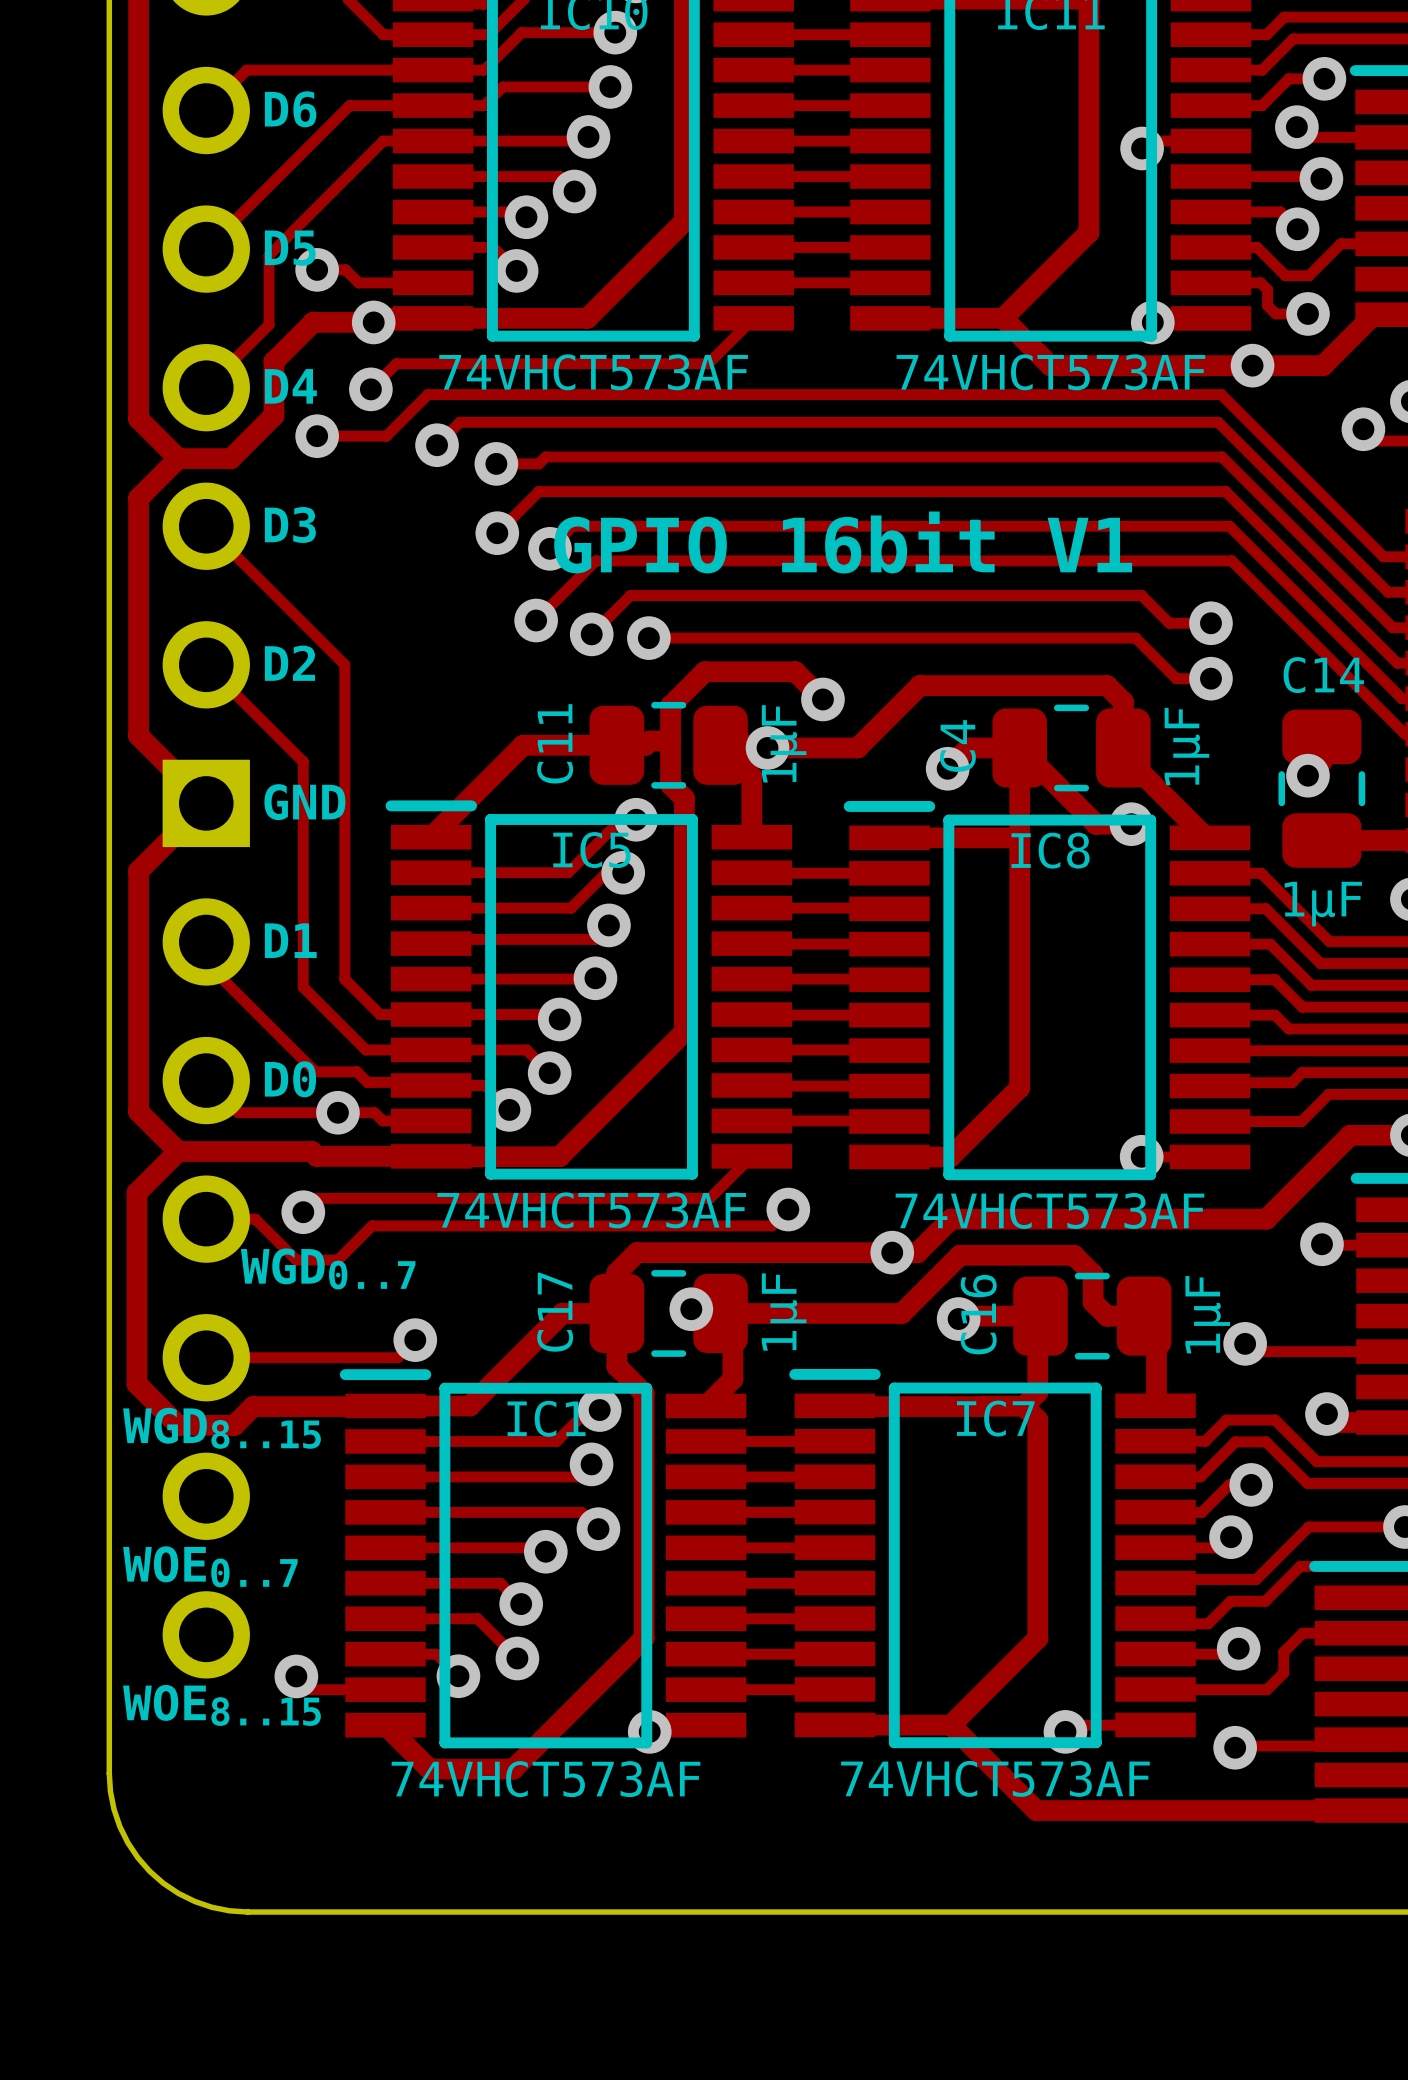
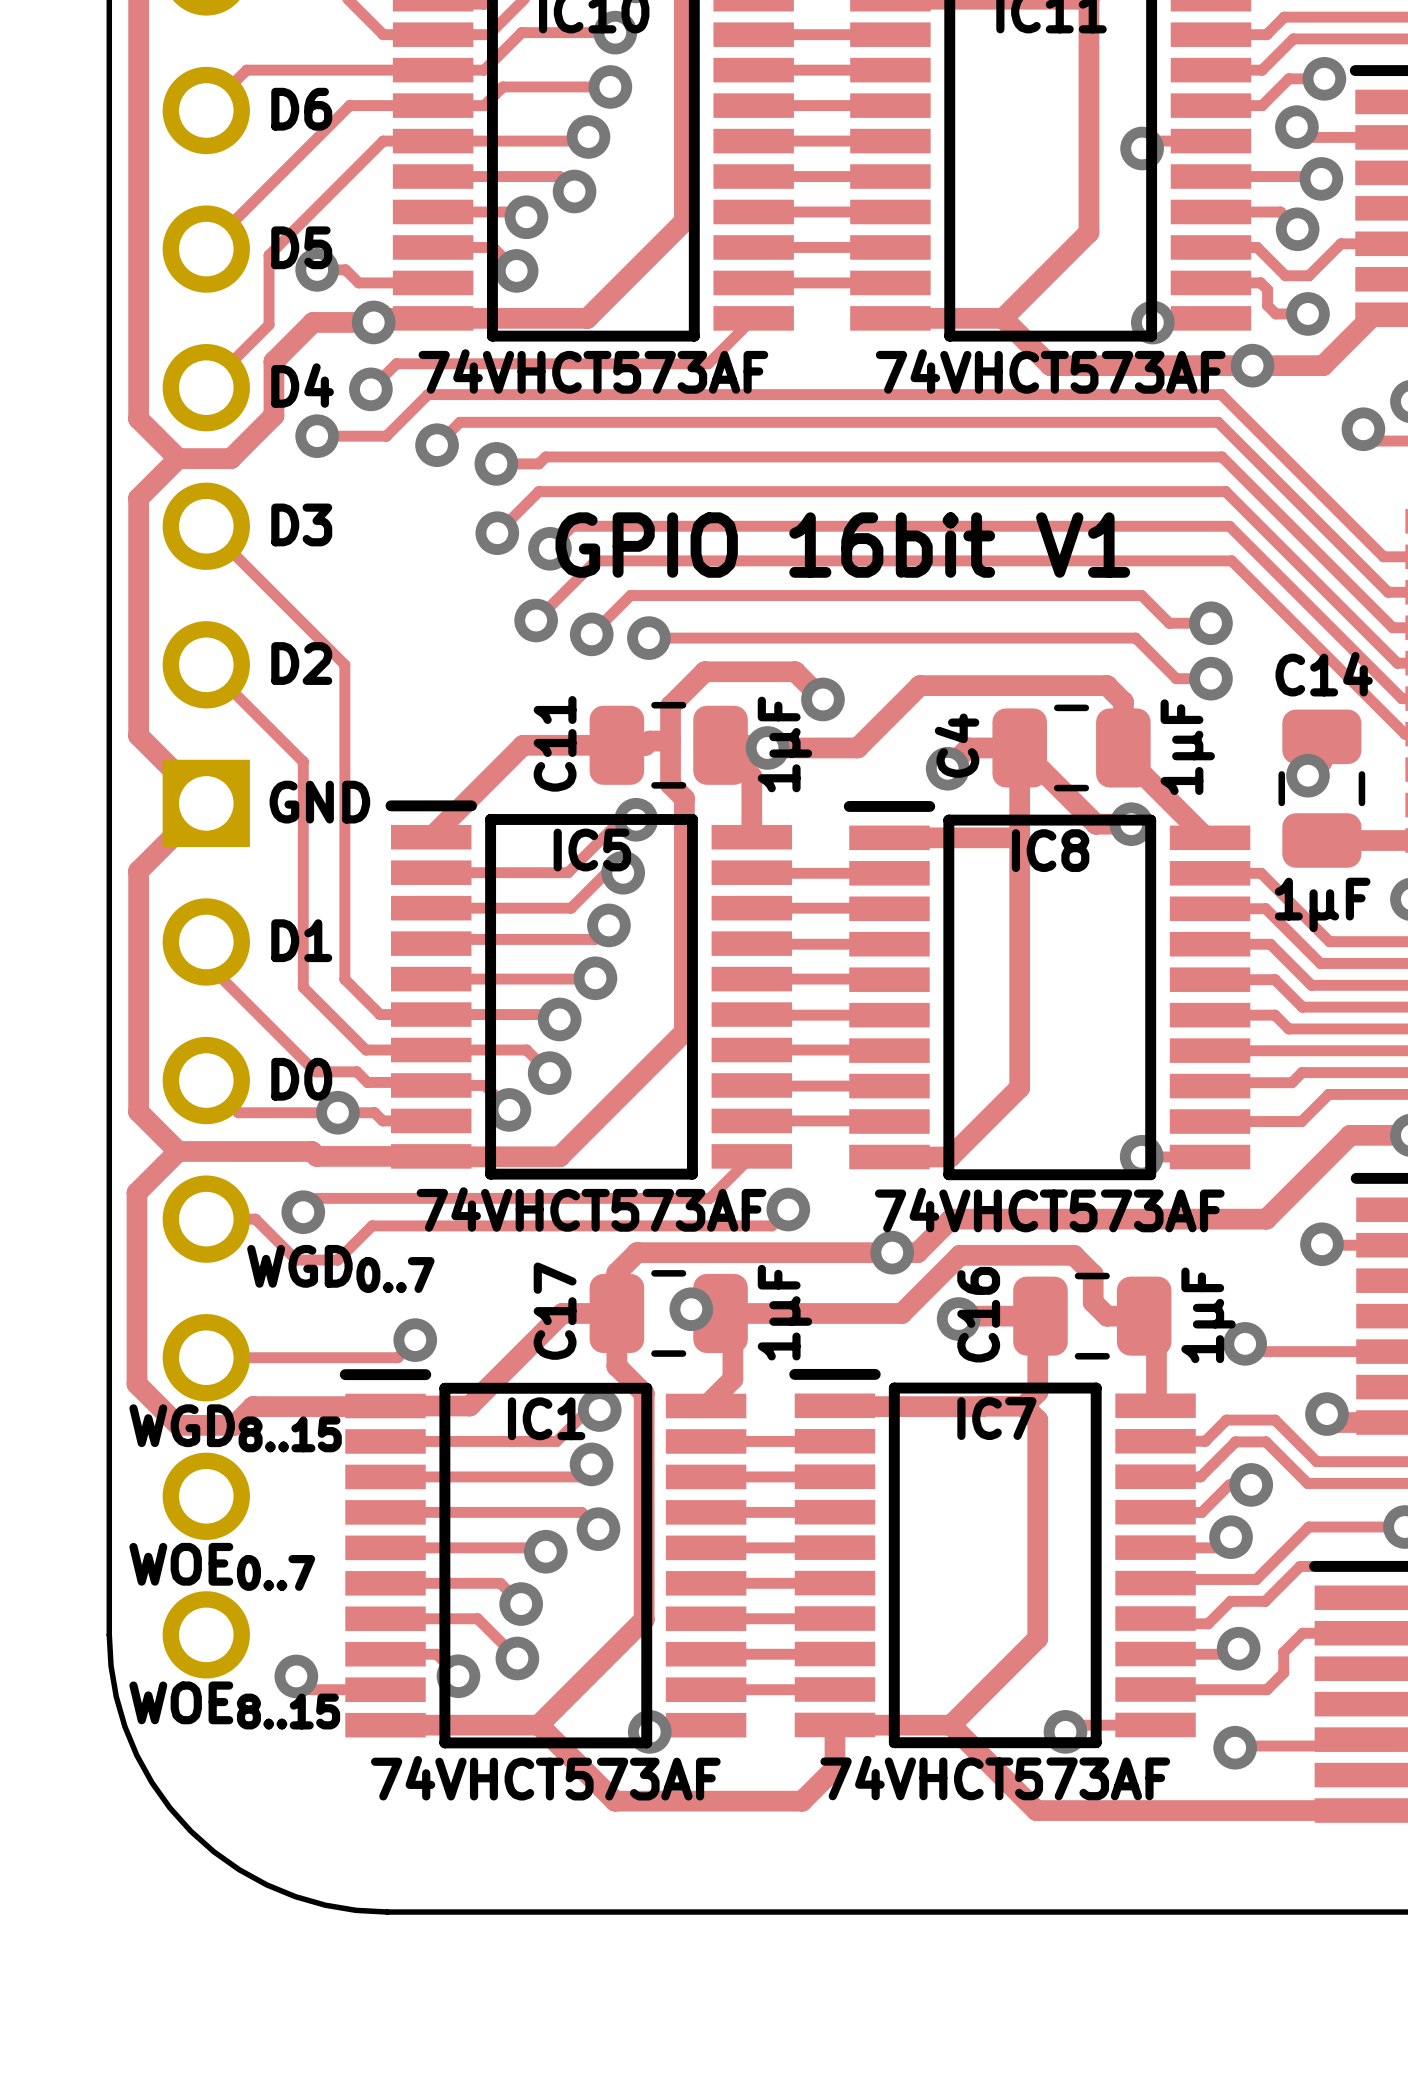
track: (644, 1619) (644, 1638) (513, 1769) (429, 1769) (385, 1725) -> (644, 1619) (538, 1725)
board edge: (109, 1634) (110, 1791) (119, 1826) (127, 1842) (149, 1871) (178, 1893) (194, 1901) (229, 1910) (387, 1912) -> (109, 1634) (111, 1665) (116, 1696) (124, 1726) (136, 1755) (151, 1782) (169, 1807) (190, 1831) (213, 1851) (239, 1869) (266, 1884) (295, 1896) (325, 1905) (356, 1910) (387, 1912)
track: none -> (385, 1725) (539, 1725) (615, 1801) (802, 1801) (834, 1768) (834, 1724)

